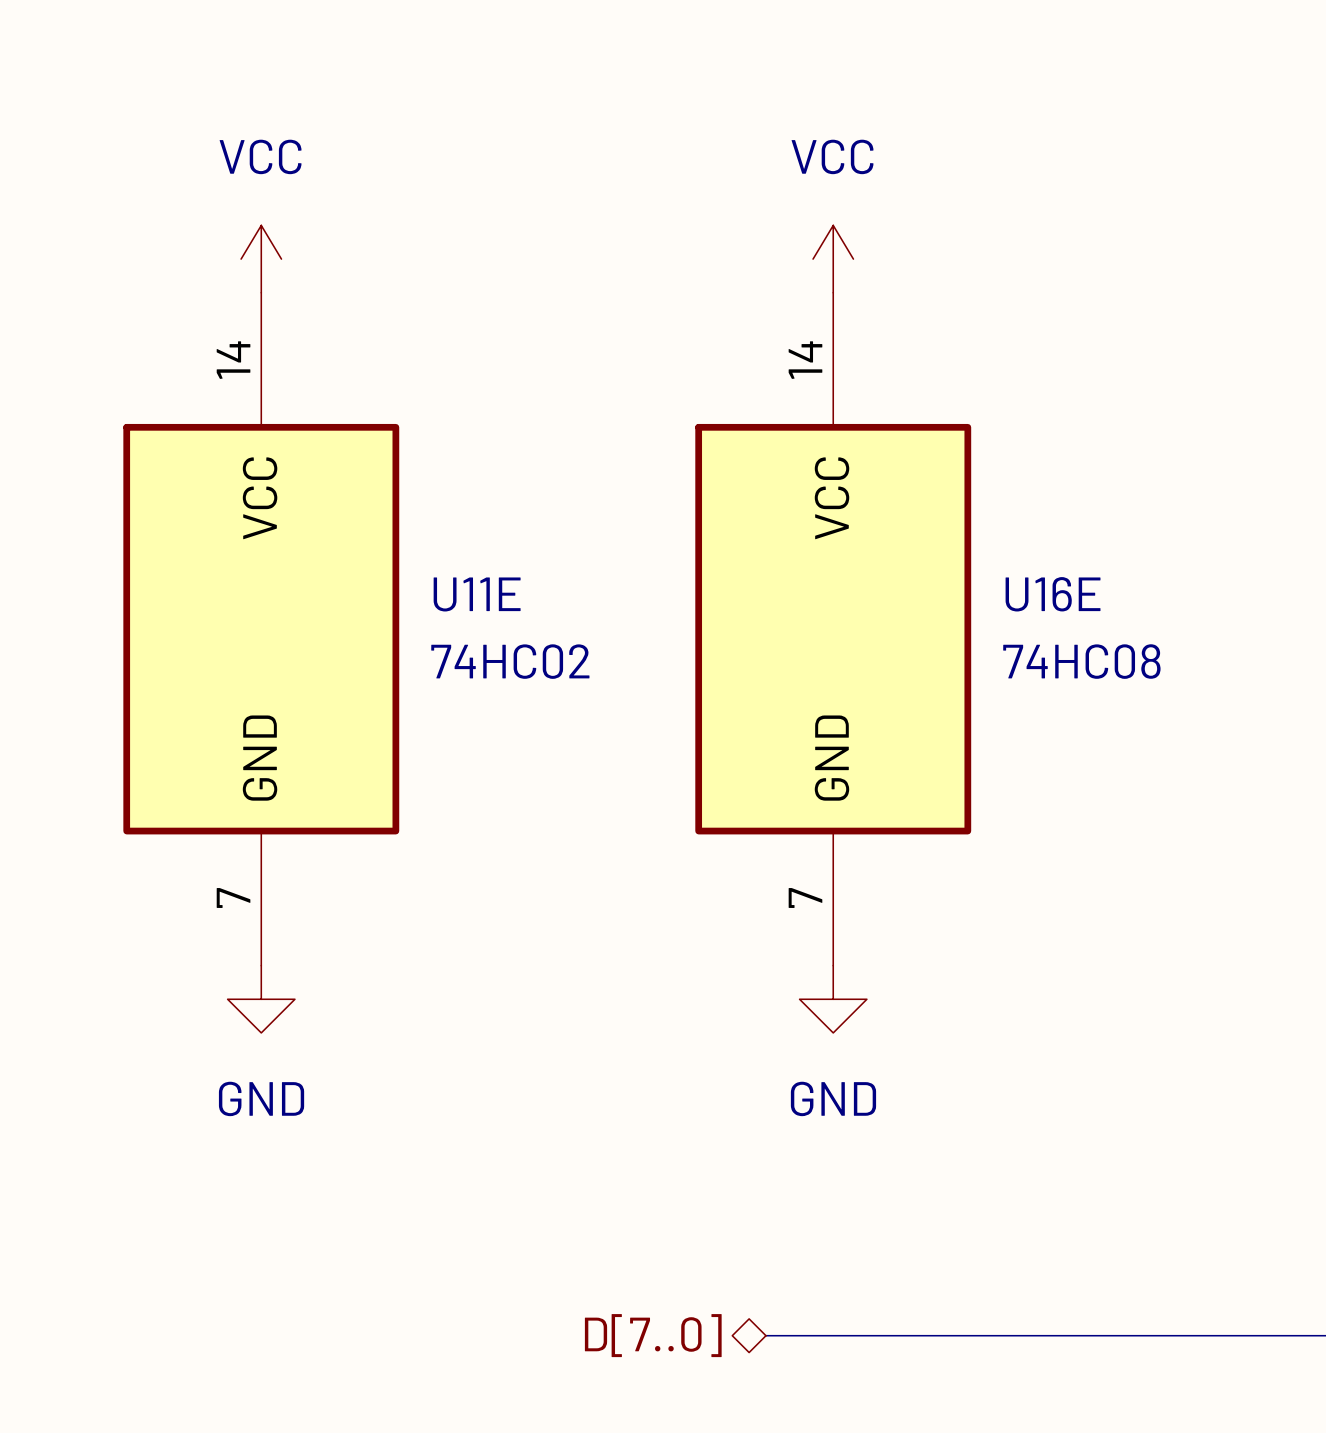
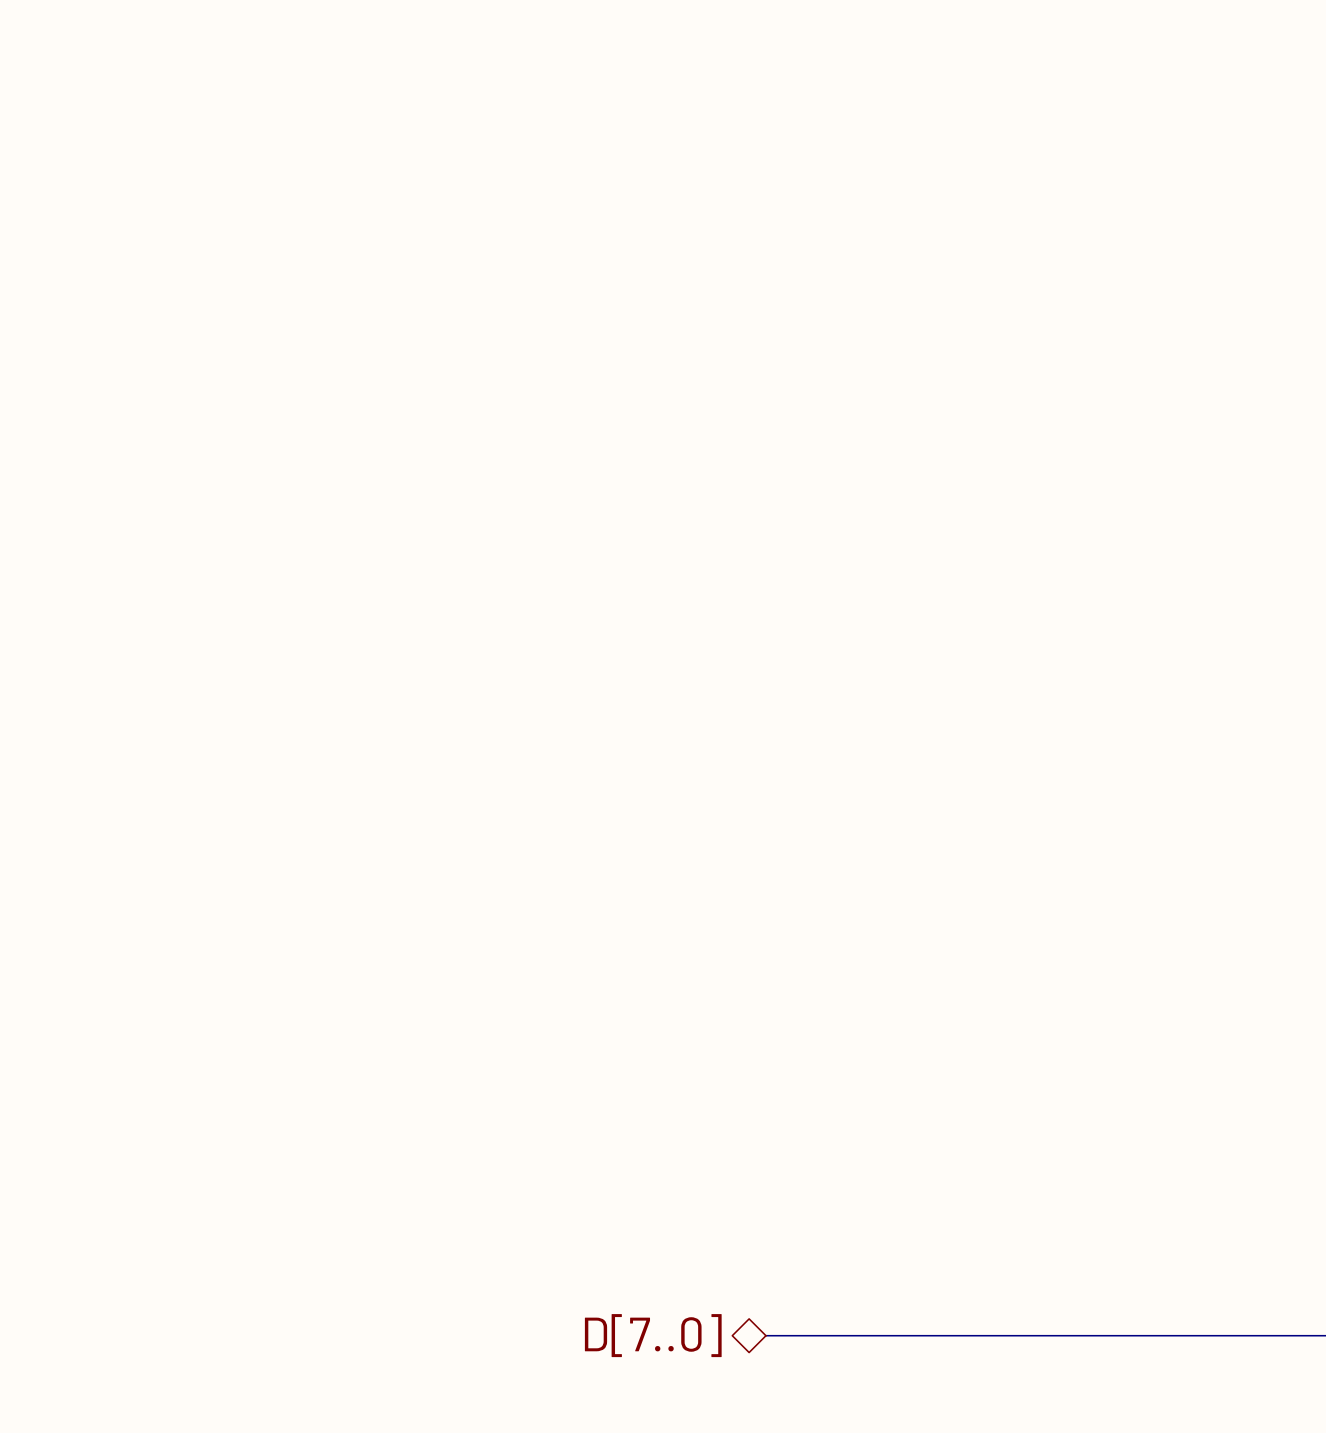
power symbol: VCC (261, 259) -> none
power symbol: VCC (833, 259) -> none
U11E: 74HC02 (261, 629) -> none
U16E: 74HC08 (833, 629) -> none
power symbol: GND (261, 999) -> none
power symbol: GND (833, 999) -> none

